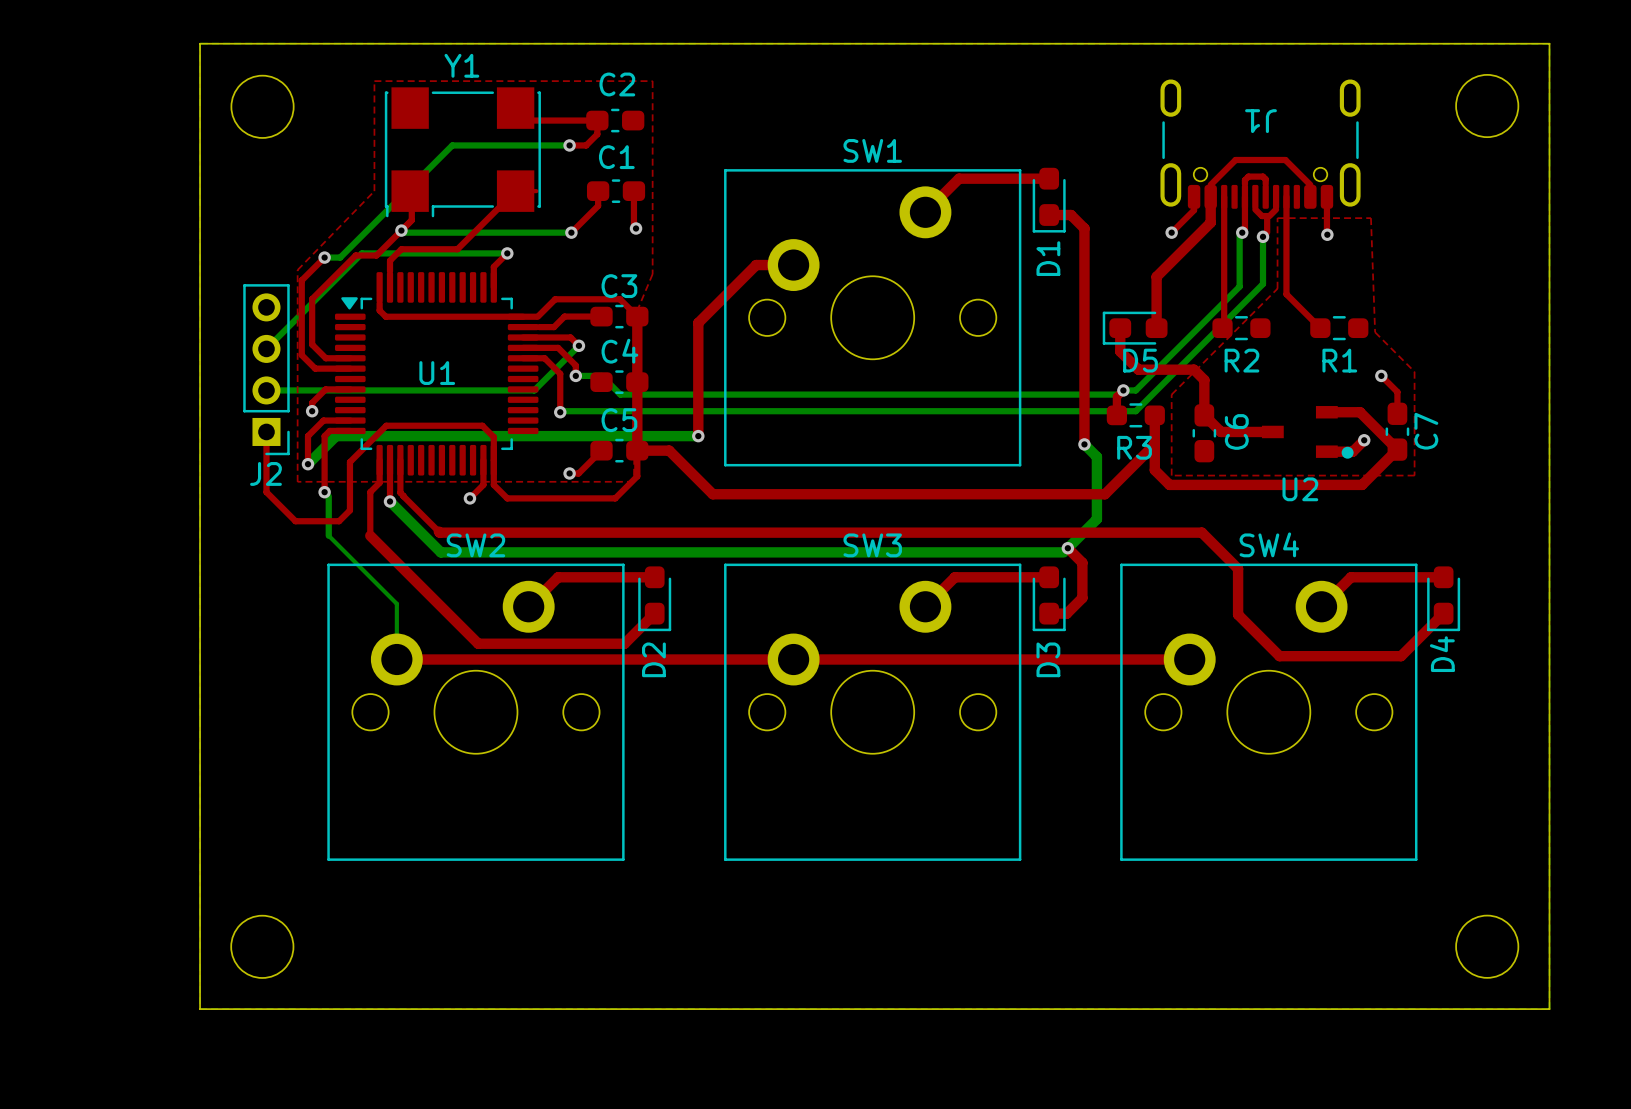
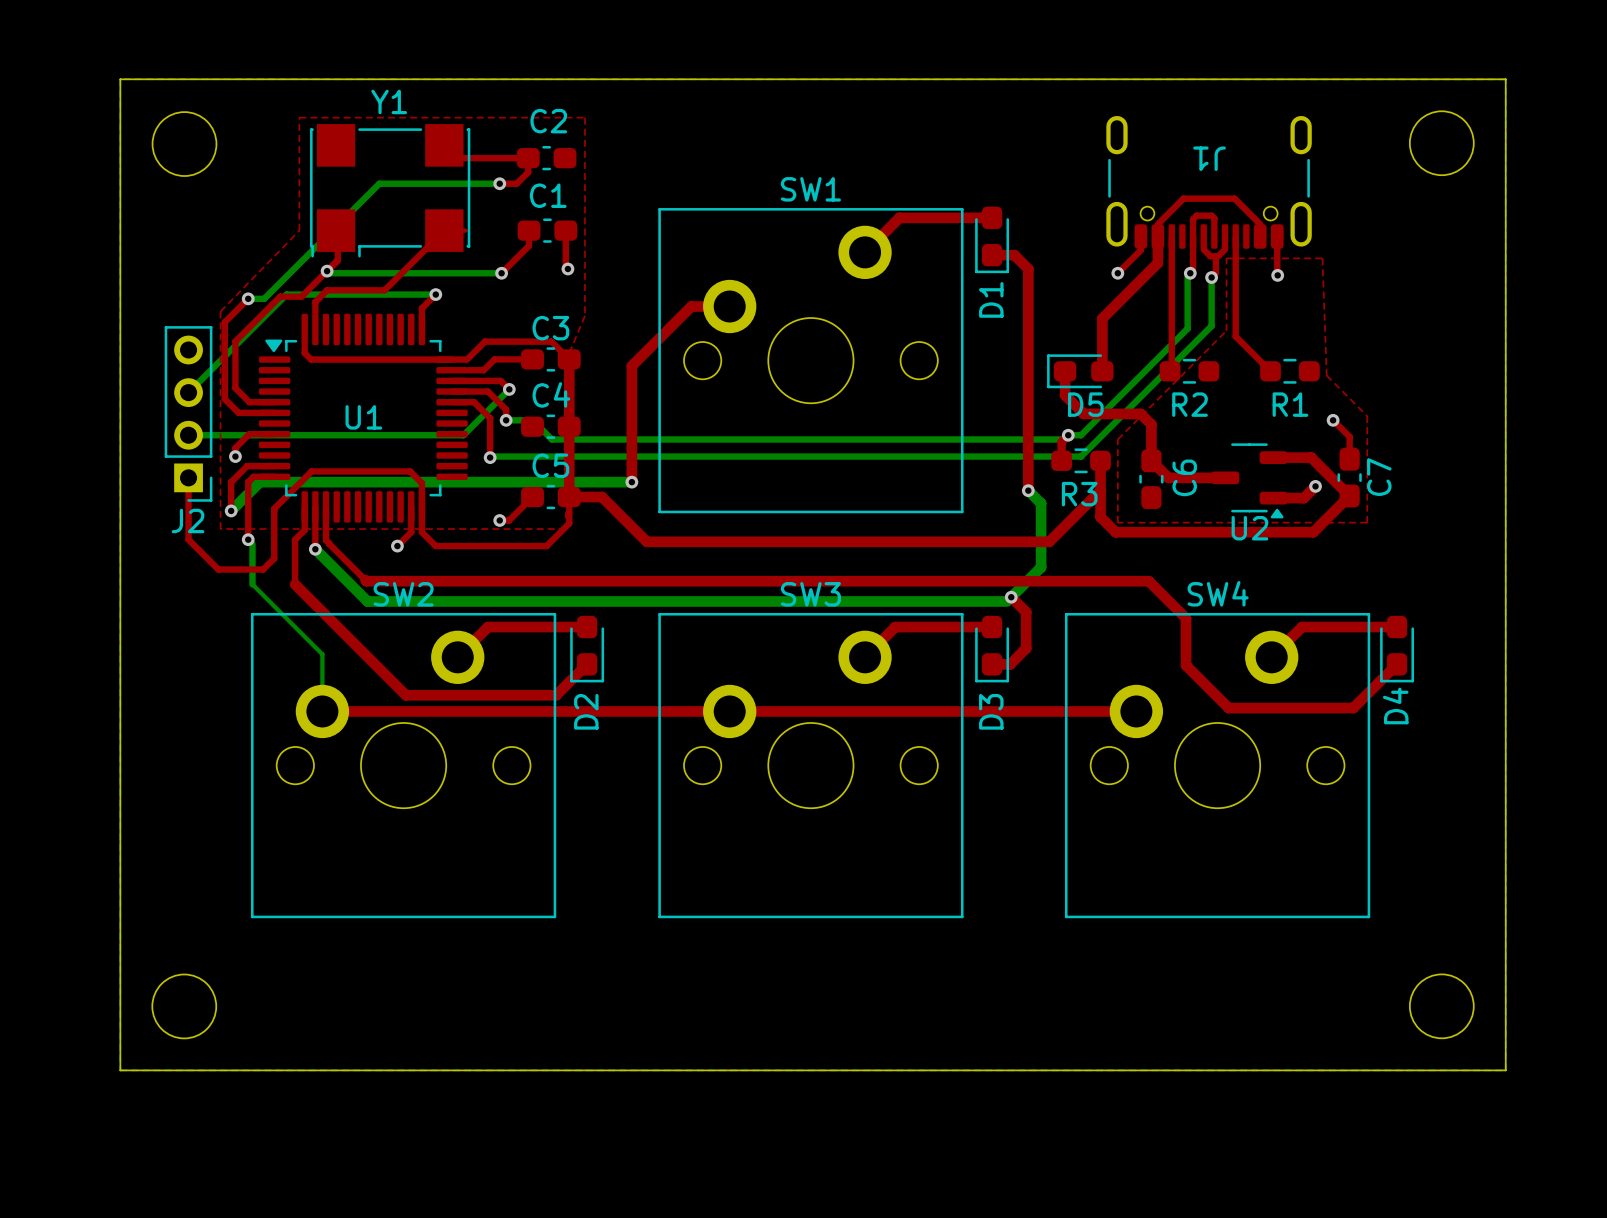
U2 footprint: [1261, 406, 1354, 459] -> [1211, 443, 1288, 519]

